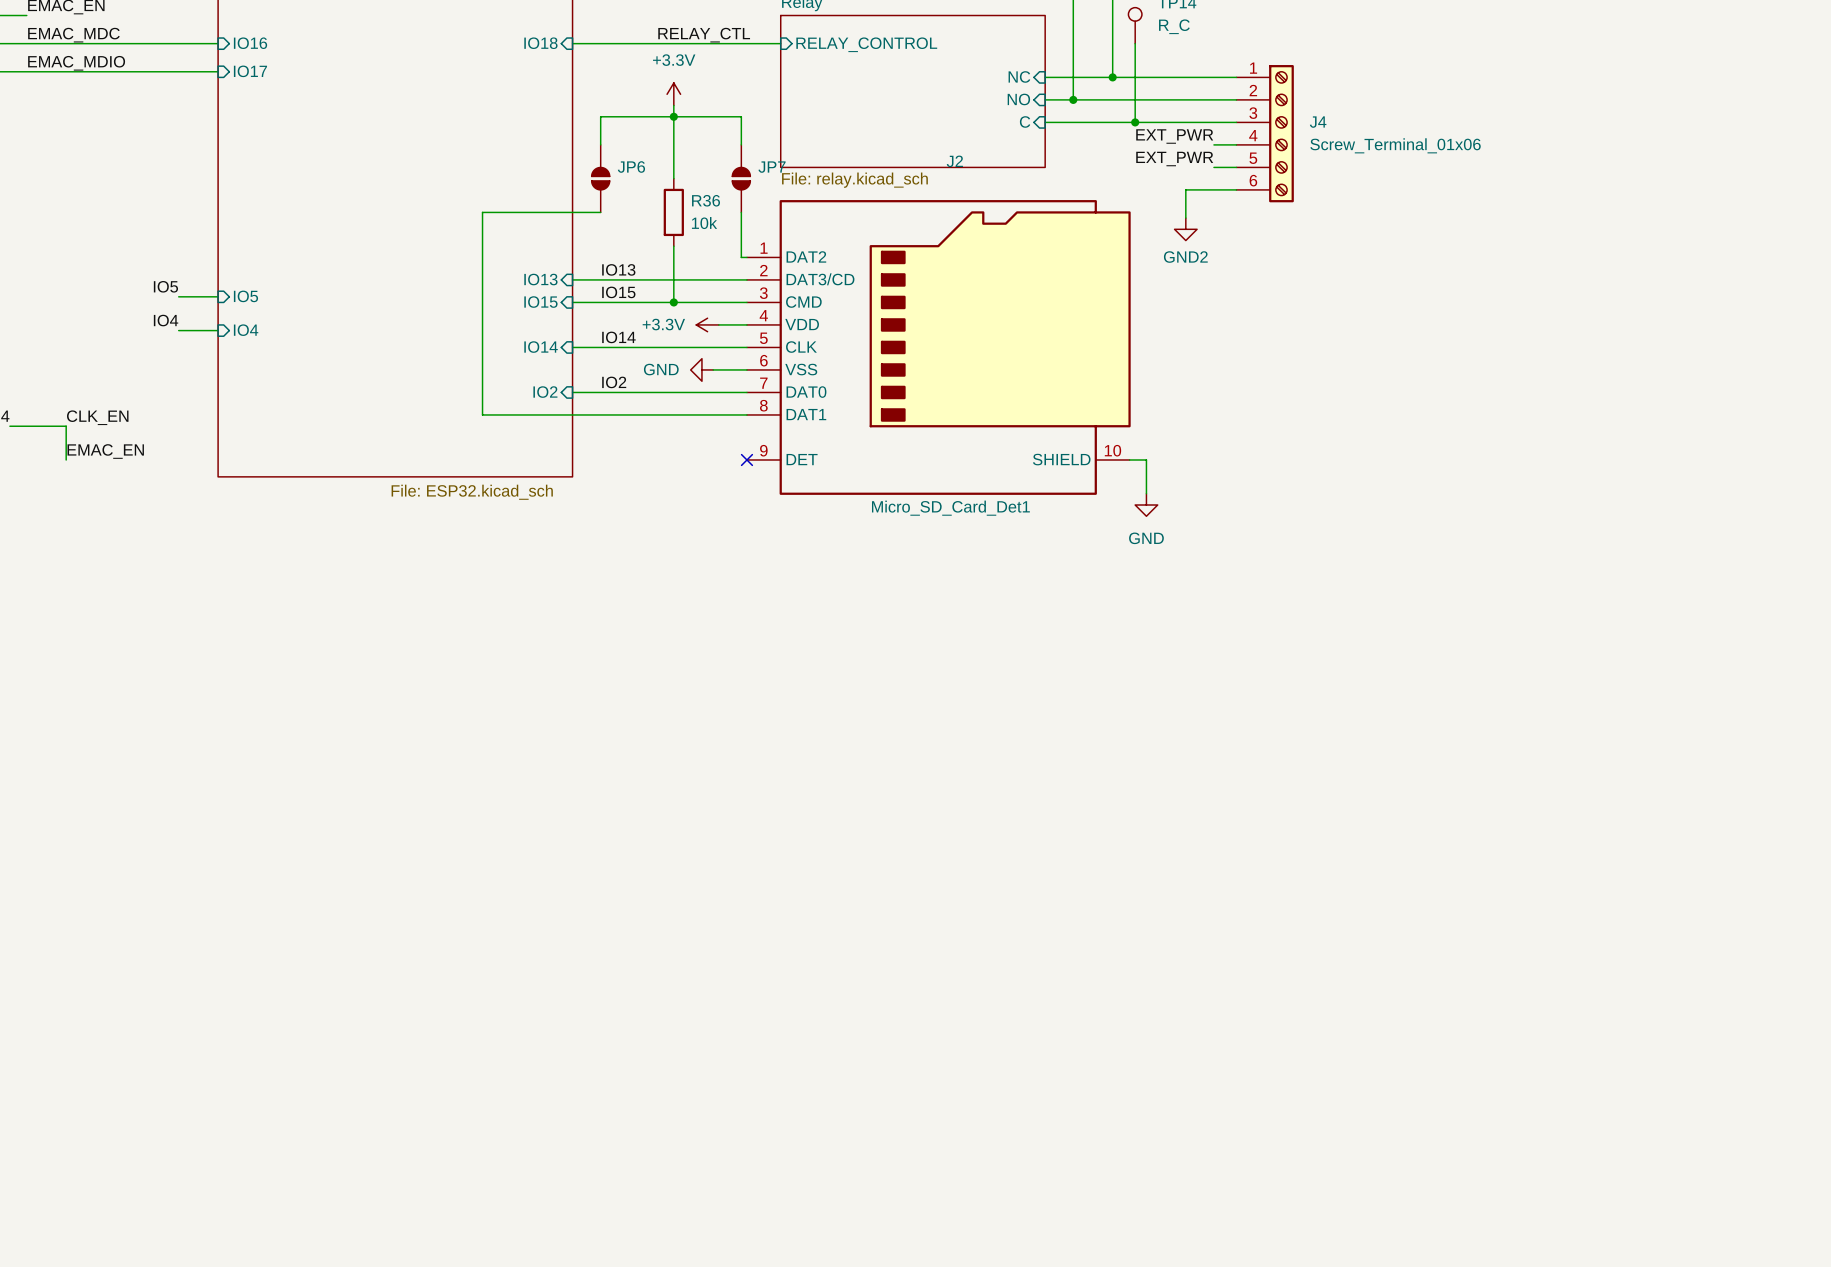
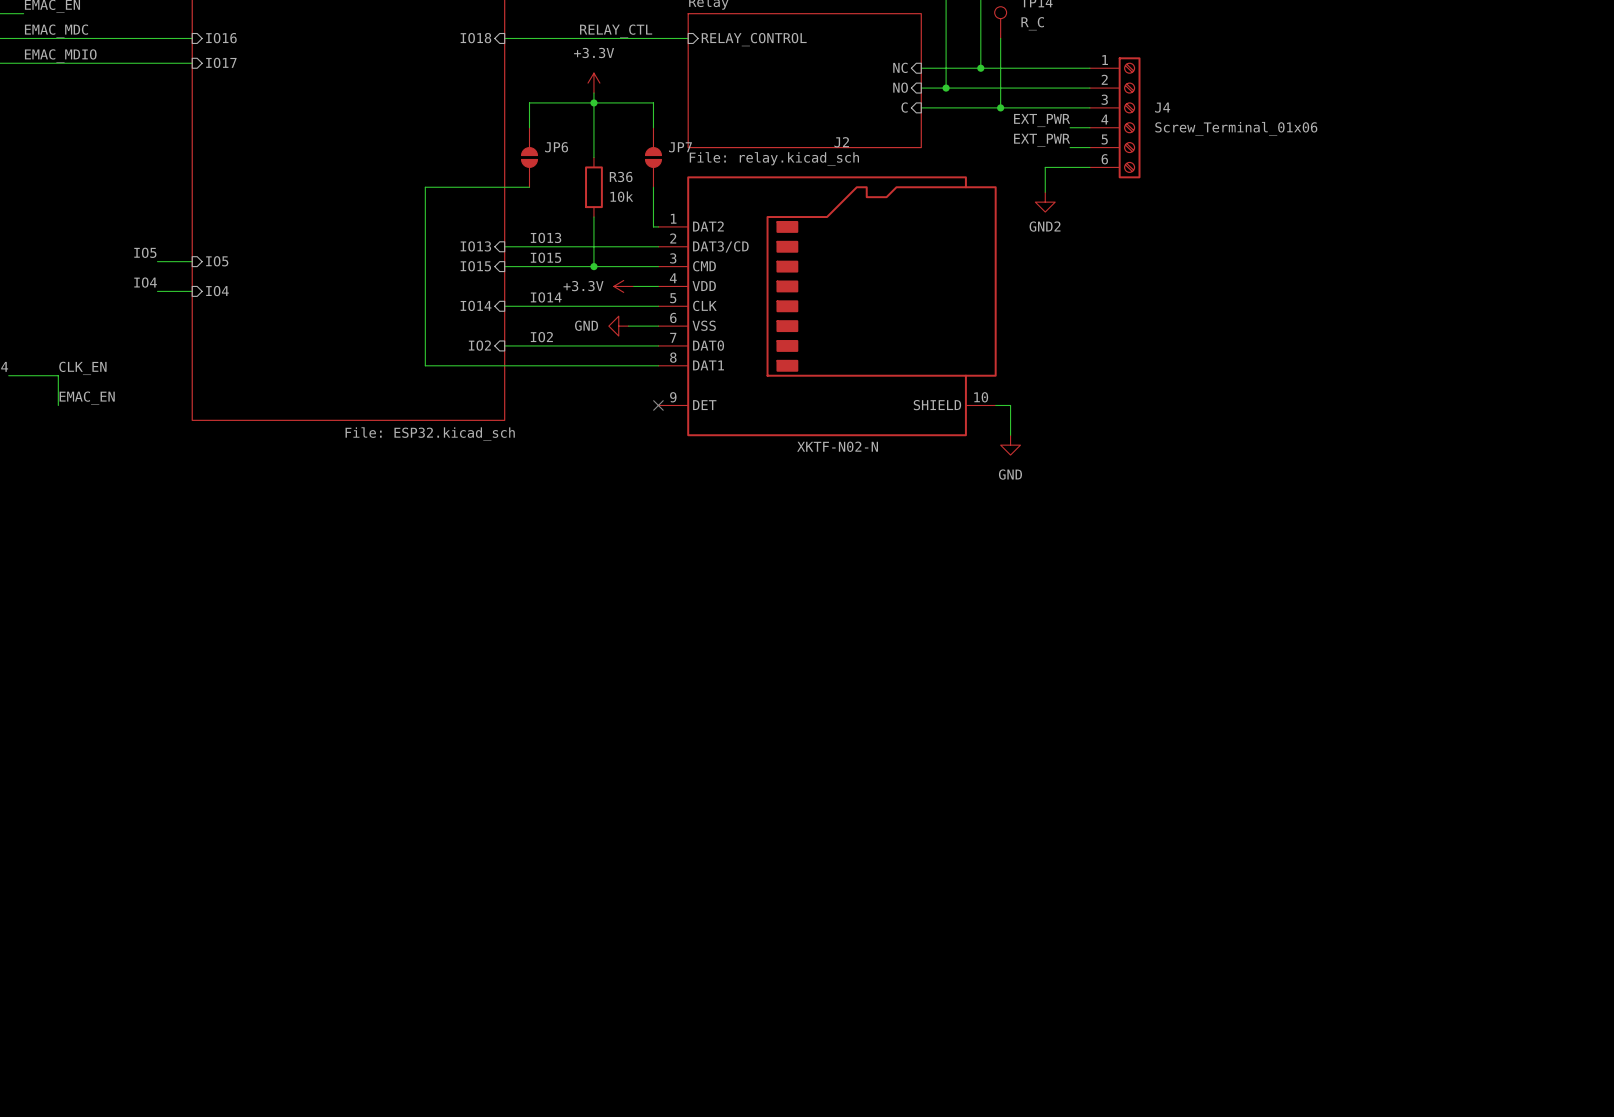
J2 value: Micro_SD_Card_Det1 (950, 508) -> XKTF-N02-N (837, 446)

